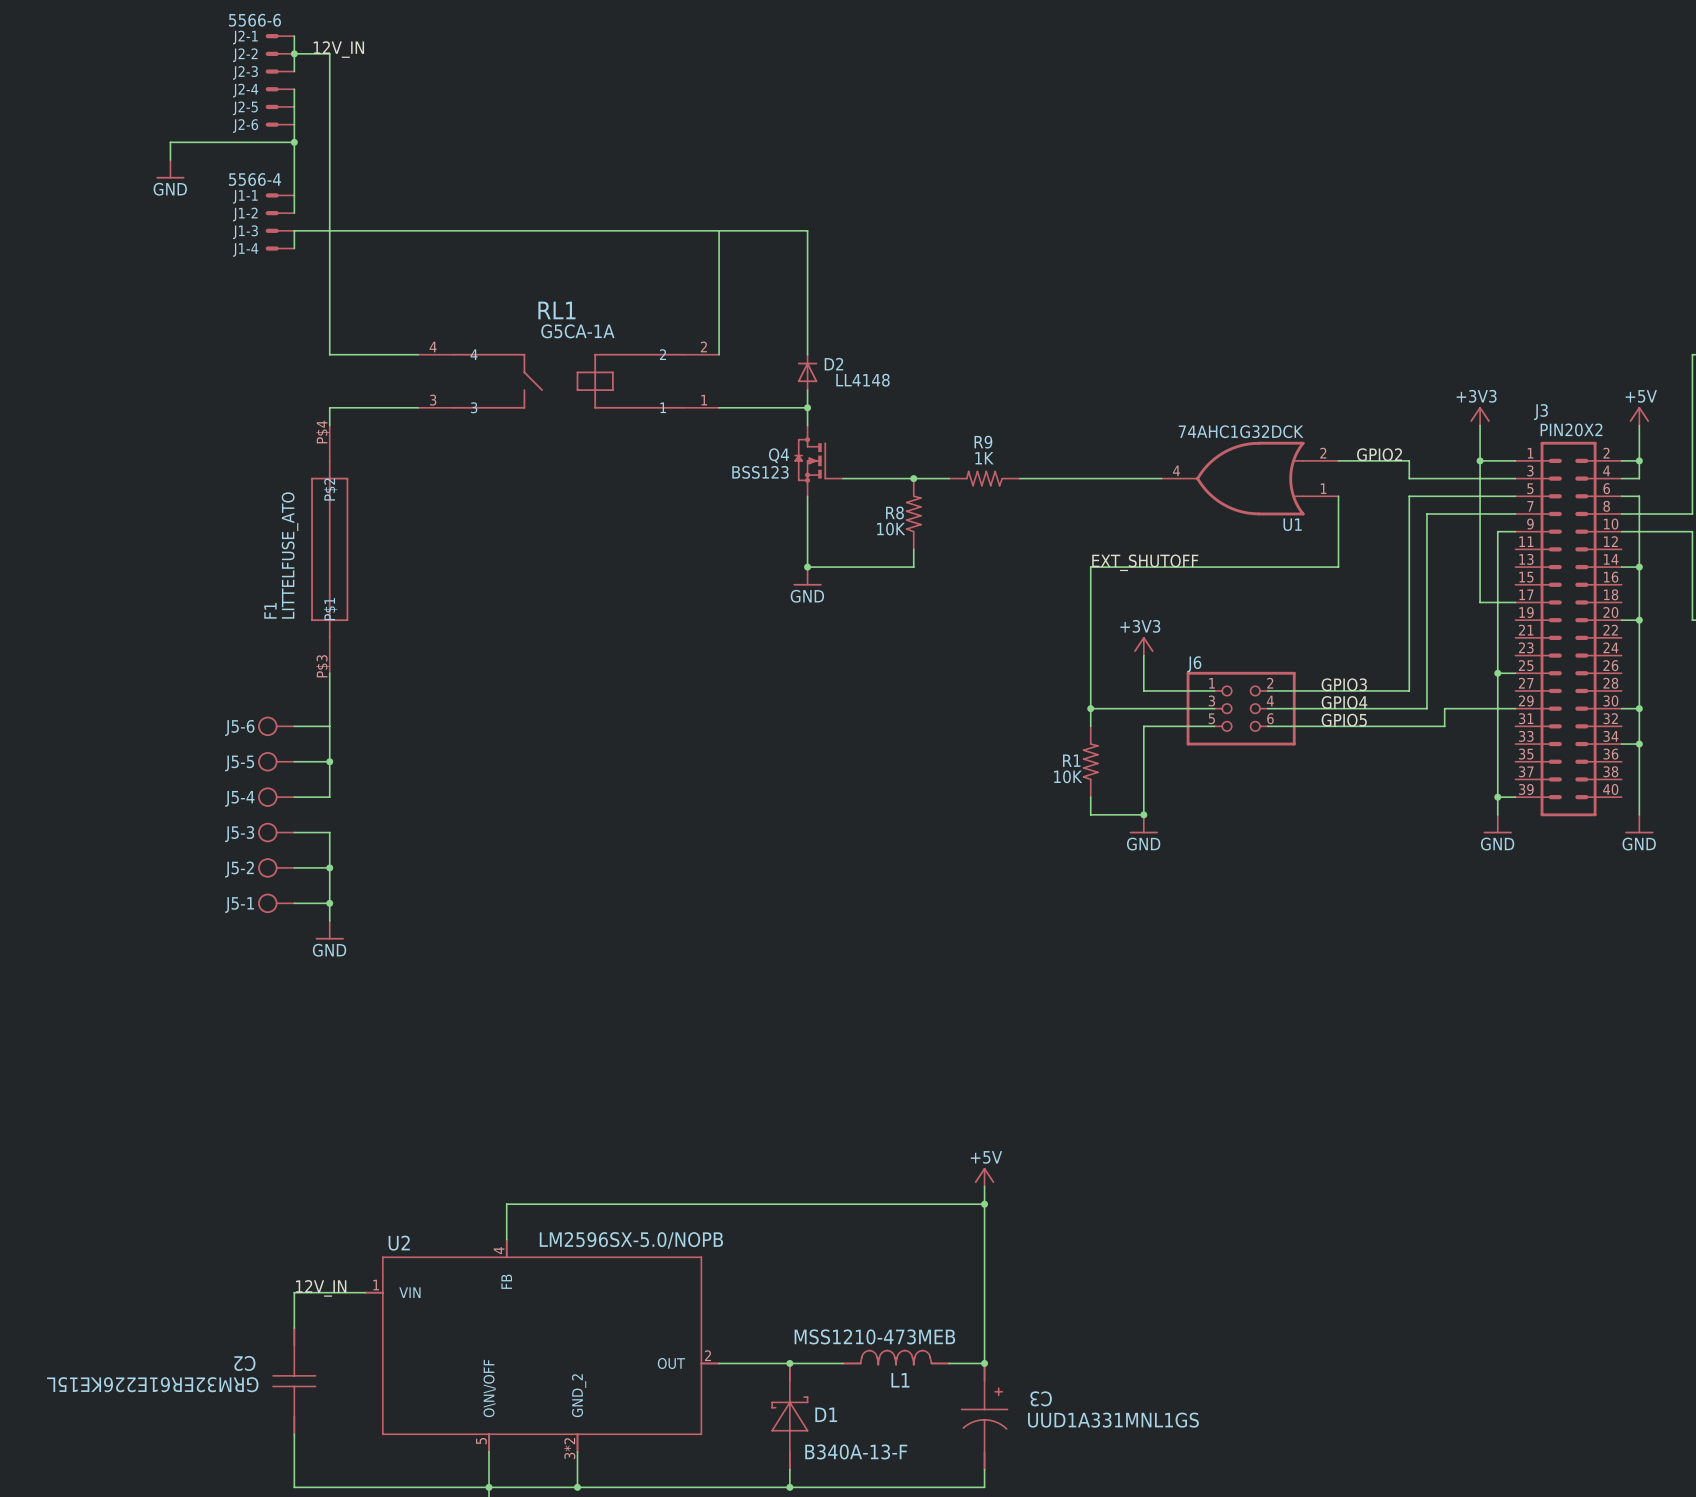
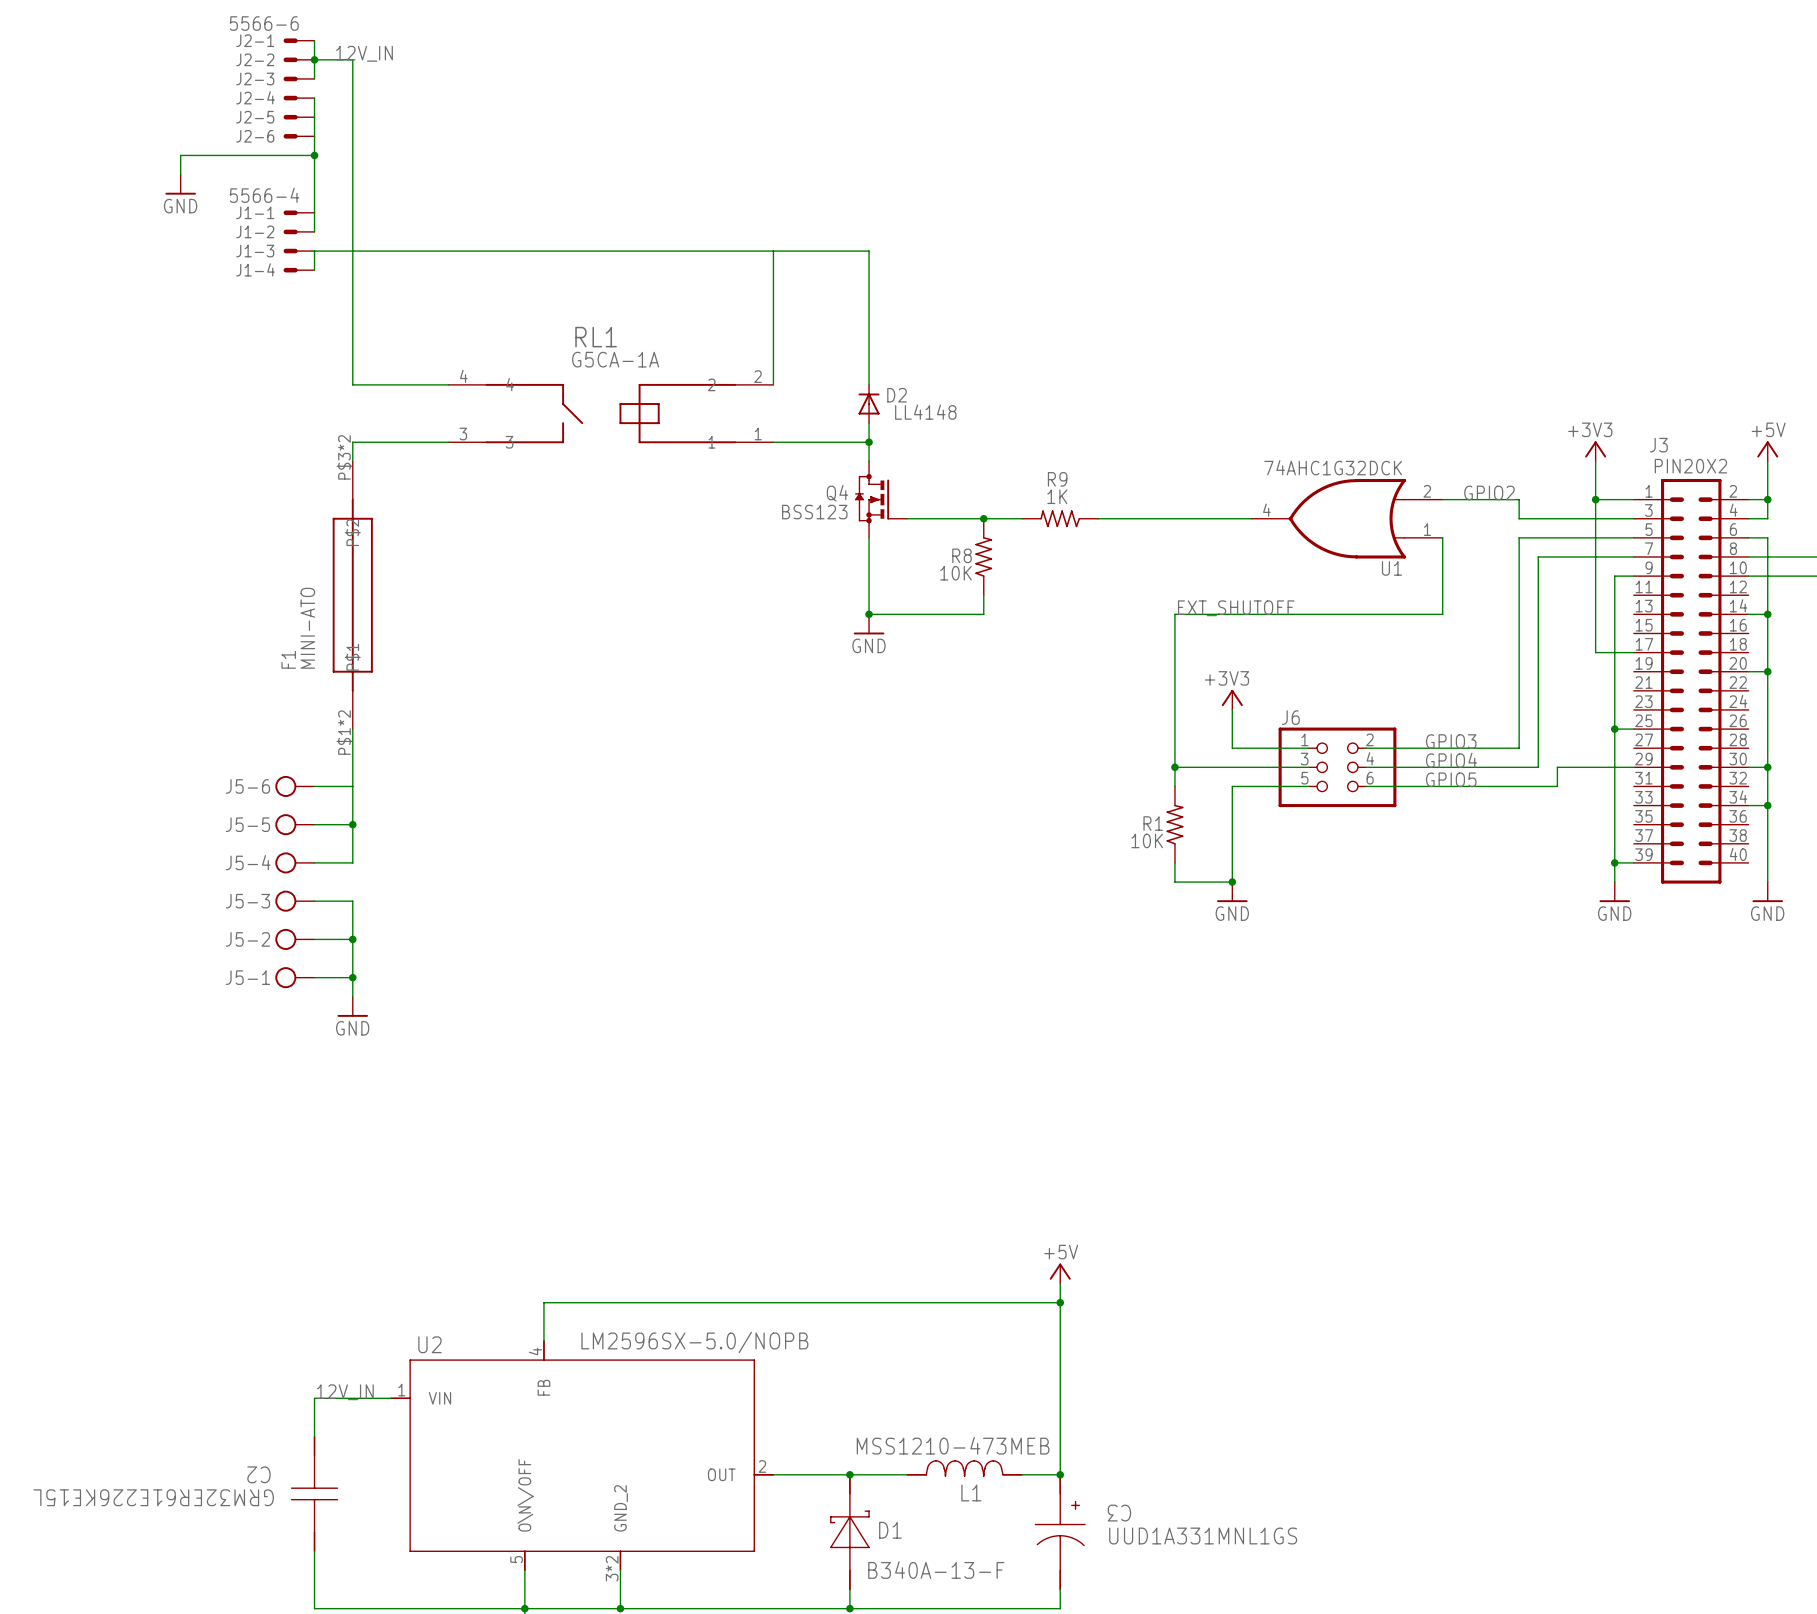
F1 pin number: P$4 (322, 432) -> P$3*2 (344, 457)
F1 value: LITTELFUSE_ATO (290, 555) -> MINI-ATO (307, 628)
F1 pin number: P$3 (322, 666) -> P$1*2 (344, 732)

